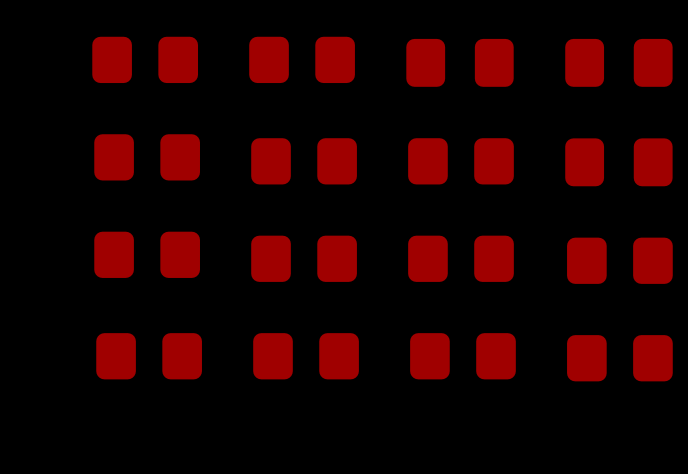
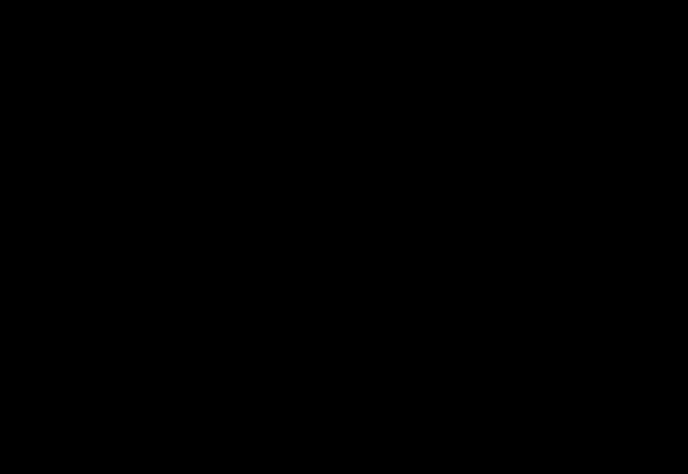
part: (145, 59) -> none
part: (302, 59) -> none
part: (460, 62) -> none
part: (618, 62) -> none
part: (147, 157) -> none
part: (304, 161) -> none
part: (460, 161) -> none
part: (618, 162) -> none
part: (147, 254) -> none
part: (304, 258) -> none
part: (460, 258) -> none
part: (619, 260) -> none
part: (149, 356) -> none
part: (306, 356) -> none
part: (462, 356) -> none
part: (619, 358) -> none

